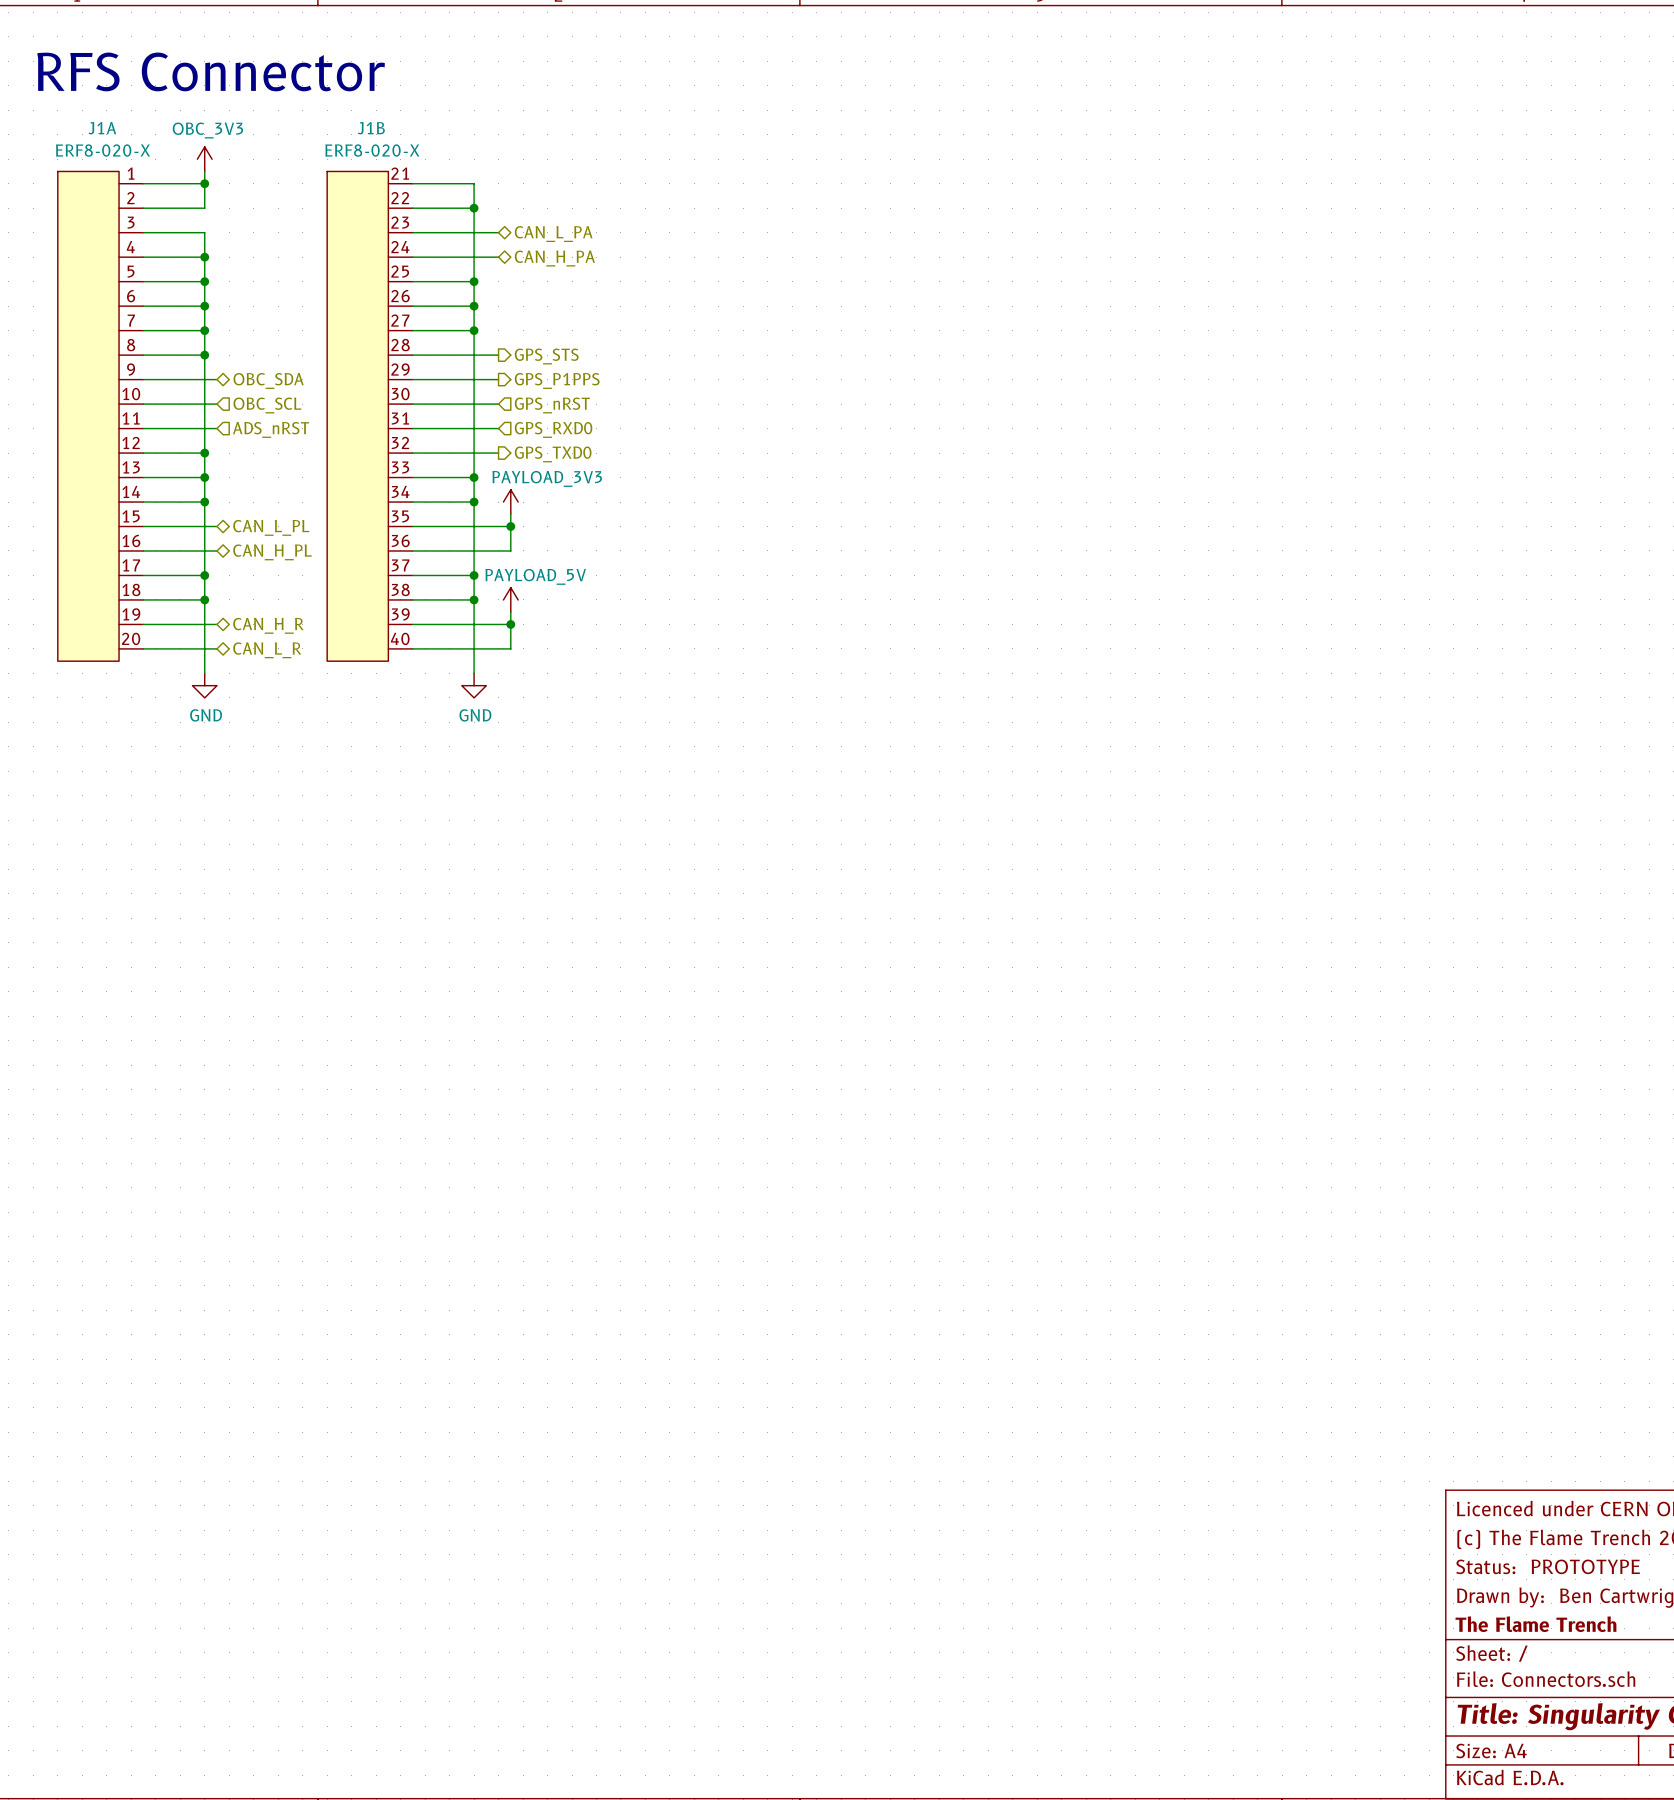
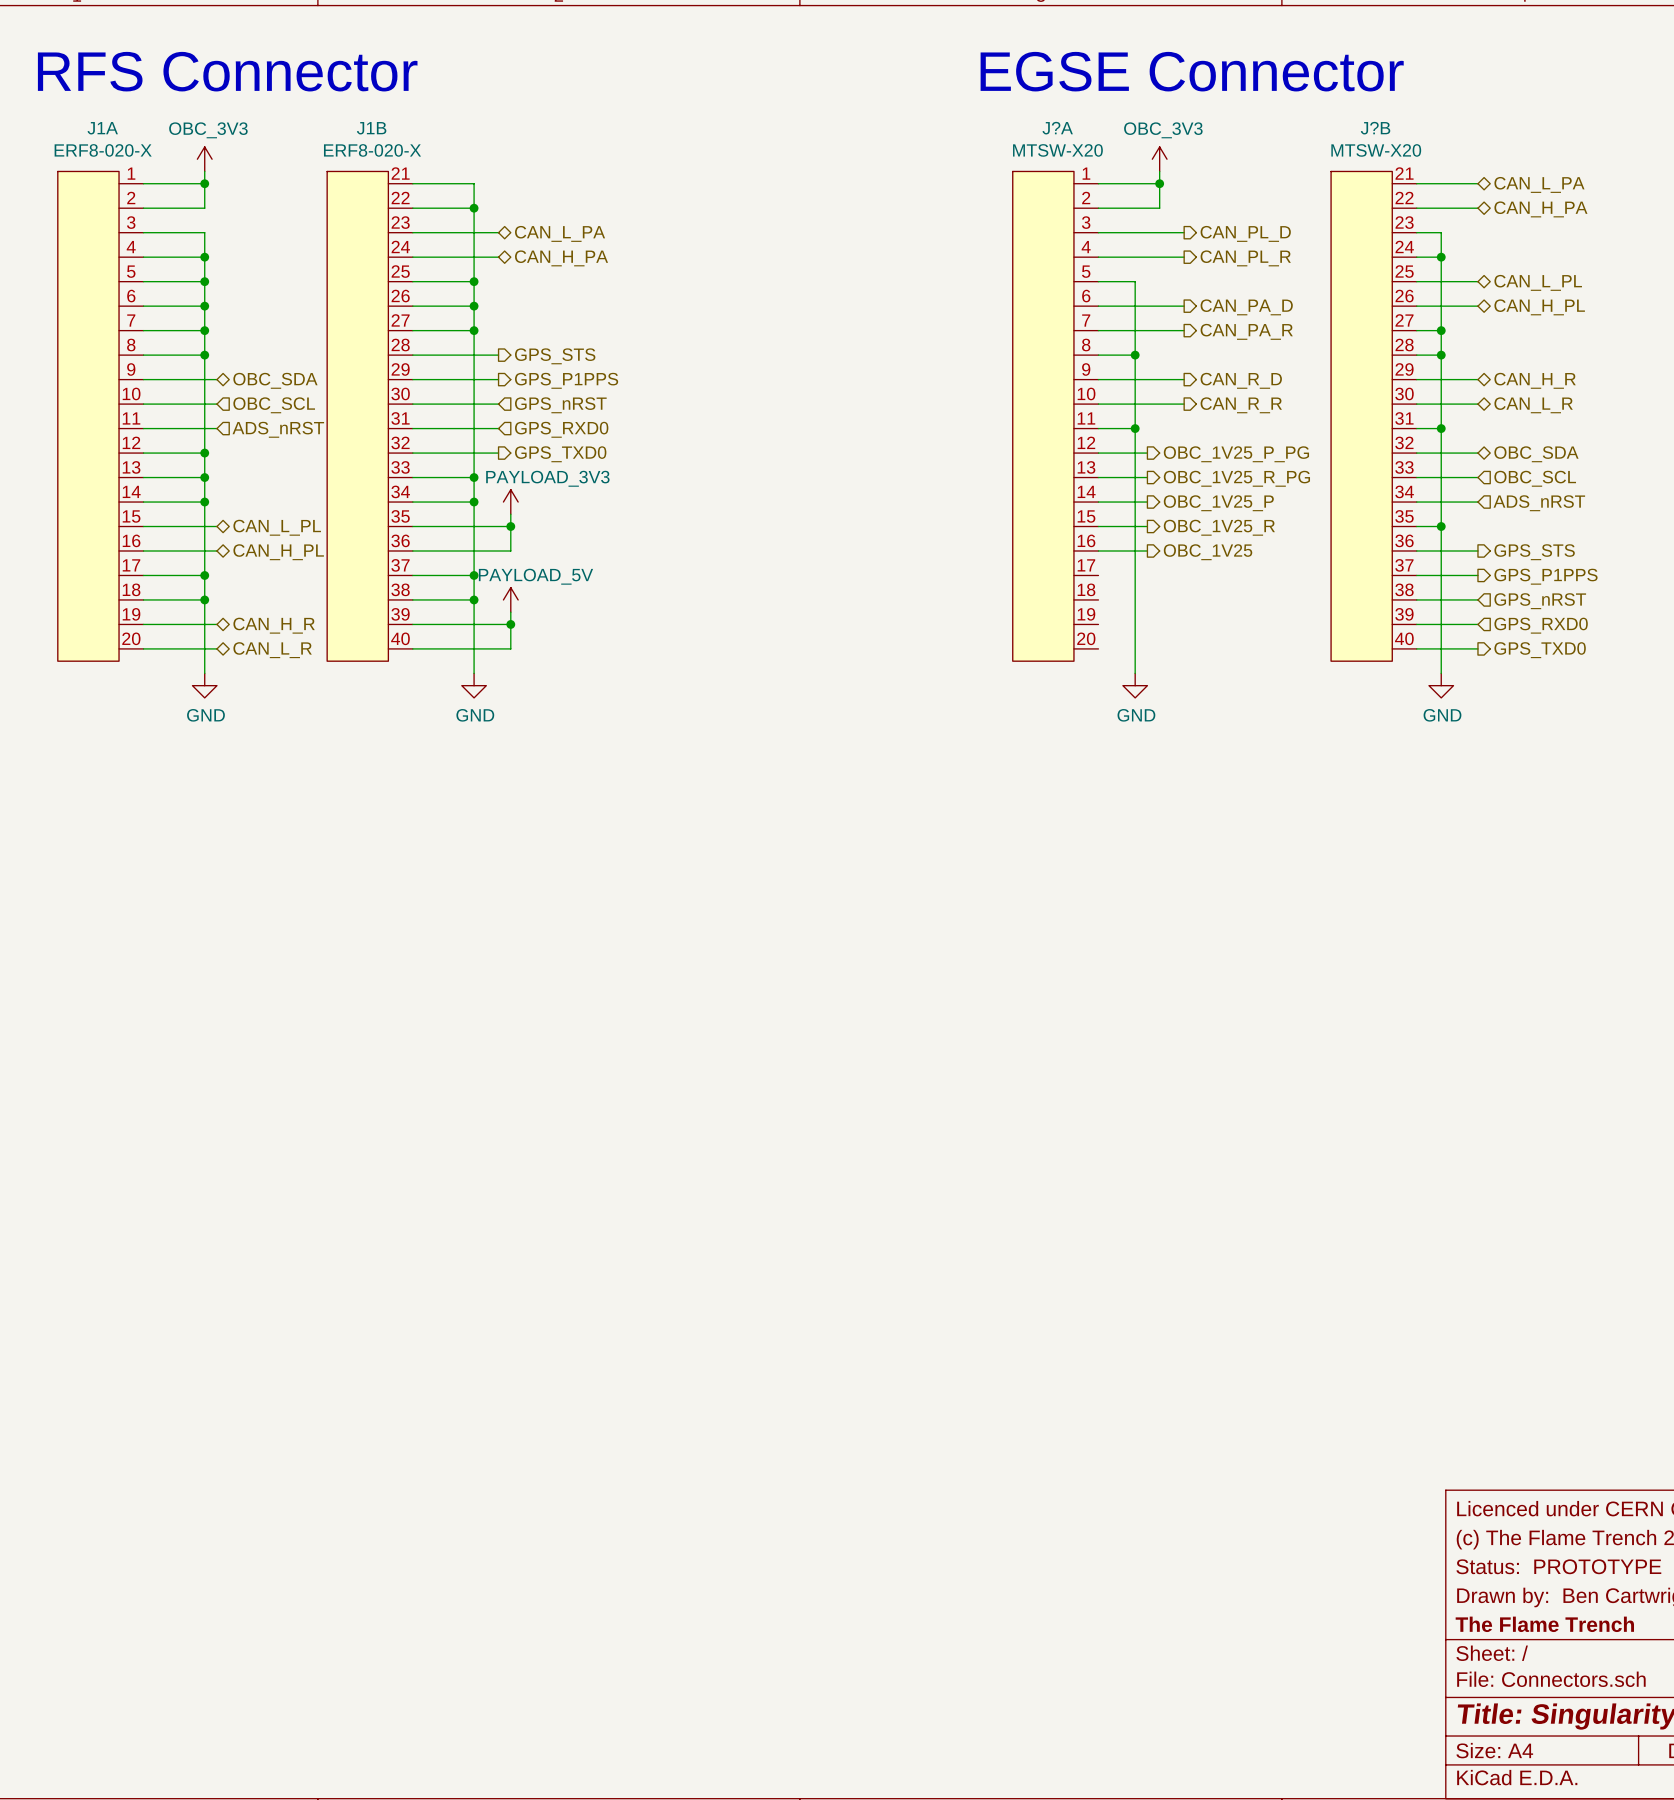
text: none -> EGSE Connector (1192, 71)
power symbol: none -> OBC_3V3 (1159, 159)
wire: none -> (1159, 171) (1159, 208) (1098, 208)
wire: none -> (1098, 183) (1159, 183)
junction: none -> (1159, 183)
wire: none -> (1416, 183) (1477, 183)
hierarchical label: none -> CAN_L_PA (1539, 184)
wire: none -> (1416, 208) (1477, 208)
hierarchical label: none -> CAN_H_PA (1540, 209)
wire: none -> (1098, 232) (1184, 232)
wire: none -> (1416, 232) (1441, 232) (1441, 673)
hierarchical label: none -> CAN_PL_D (1245, 233)
wire: none -> (1098, 257) (1184, 257)
wire: none -> (1416, 257) (1441, 257)
junction: none -> (1441, 257)
hierarchical label: none -> CAN_PL_R (1245, 258)
wire: none -> (1098, 281) (1135, 281) (1135, 673)
wire: none -> (1416, 281) (1477, 281)
hierarchical label: none -> CAN_L_PL (1538, 282)
wire: none -> (1098, 306) (1184, 306)
wire: none -> (1416, 306) (1477, 306)
hierarchical label: none -> CAN_PA_D (1246, 307)
hierarchical label: none -> CAN_H_PL (1539, 307)
wire: none -> (1098, 330) (1184, 330)
wire: none -> (1416, 330) (1441, 330)
junction: none -> (1441, 330)
hierarchical label: none -> CAN_PA_R (1246, 331)
wire: none -> (1098, 355) (1135, 355)
junction: none -> (1135, 355)
wire: none -> (1416, 355) (1441, 355)
junction: none -> (1441, 355)
wire: none -> (1098, 379) (1184, 379)
wire: none -> (1416, 379) (1477, 379)
hierarchical label: none -> CAN_R_D (1241, 380)
hierarchical label: none -> CAN_H_R (1535, 380)
wire: none -> (1098, 404) (1184, 404)
wire: none -> (1416, 404) (1477, 404)
hierarchical label: none -> CAN_R_R (1241, 405)
hierarchical label: none -> CAN_L_R (1533, 405)
J?A: none -> MTSW-X20 (1055, 416)
J?B: none -> MTSW-X20 (1373, 416)
wire: none -> (1098, 428) (1135, 428)
junction: none -> (1135, 428)
wire: none -> (1416, 428) (1441, 428)
junction: none -> (1441, 428)
wire: none -> (1098, 453) (1147, 453)
wire: none -> (1416, 453) (1477, 453)
hierarchical label: none -> OBC_1V25_P_PG (1236, 454)
hierarchical label: none -> OBC_SDA (1536, 454)
wire: none -> (1098, 477) (1147, 477)
wire: none -> (1416, 477) (1477, 477)
hierarchical label: none -> OBC_1V25_R_PG (1236, 478)
hierarchical label: none -> OBC_SCL (1535, 478)
wire: none -> (1098, 502) (1147, 502)
wire: none -> (1416, 502) (1477, 502)
hierarchical label: none -> OBC_1V25_P (1218, 503)
hierarchical label: none -> ADS_nRST (1539, 503)
wire: none -> (1098, 526) (1147, 526)
wire: none -> (1416, 526) (1441, 526)
junction: none -> (1441, 526)
hierarchical label: none -> OBC_1V25_R (1219, 527)
wire: none -> (1098, 550) (1147, 550)
wire: none -> (1416, 550) (1477, 550)
hierarchical label: none -> OBC_1V25 (1208, 552)
hierarchical label: none -> GPS_STS (1534, 552)
wire: none -> (1416, 575) (1477, 575)
hierarchical label: none -> GPS_P1PPS (1545, 576)
wire: none -> (1416, 599) (1477, 599)
hierarchical label: none -> GPS_nRST (1540, 601)
wire: none -> (1416, 624) (1477, 624)
hierarchical label: none -> GPS_RXD0 (1541, 625)
wire: none -> (1416, 648) (1477, 648)
hierarchical label: none -> GPS_TXD0 (1540, 650)
power symbol: none -> GND (1135, 685)
power symbol: none -> GND (1441, 685)

